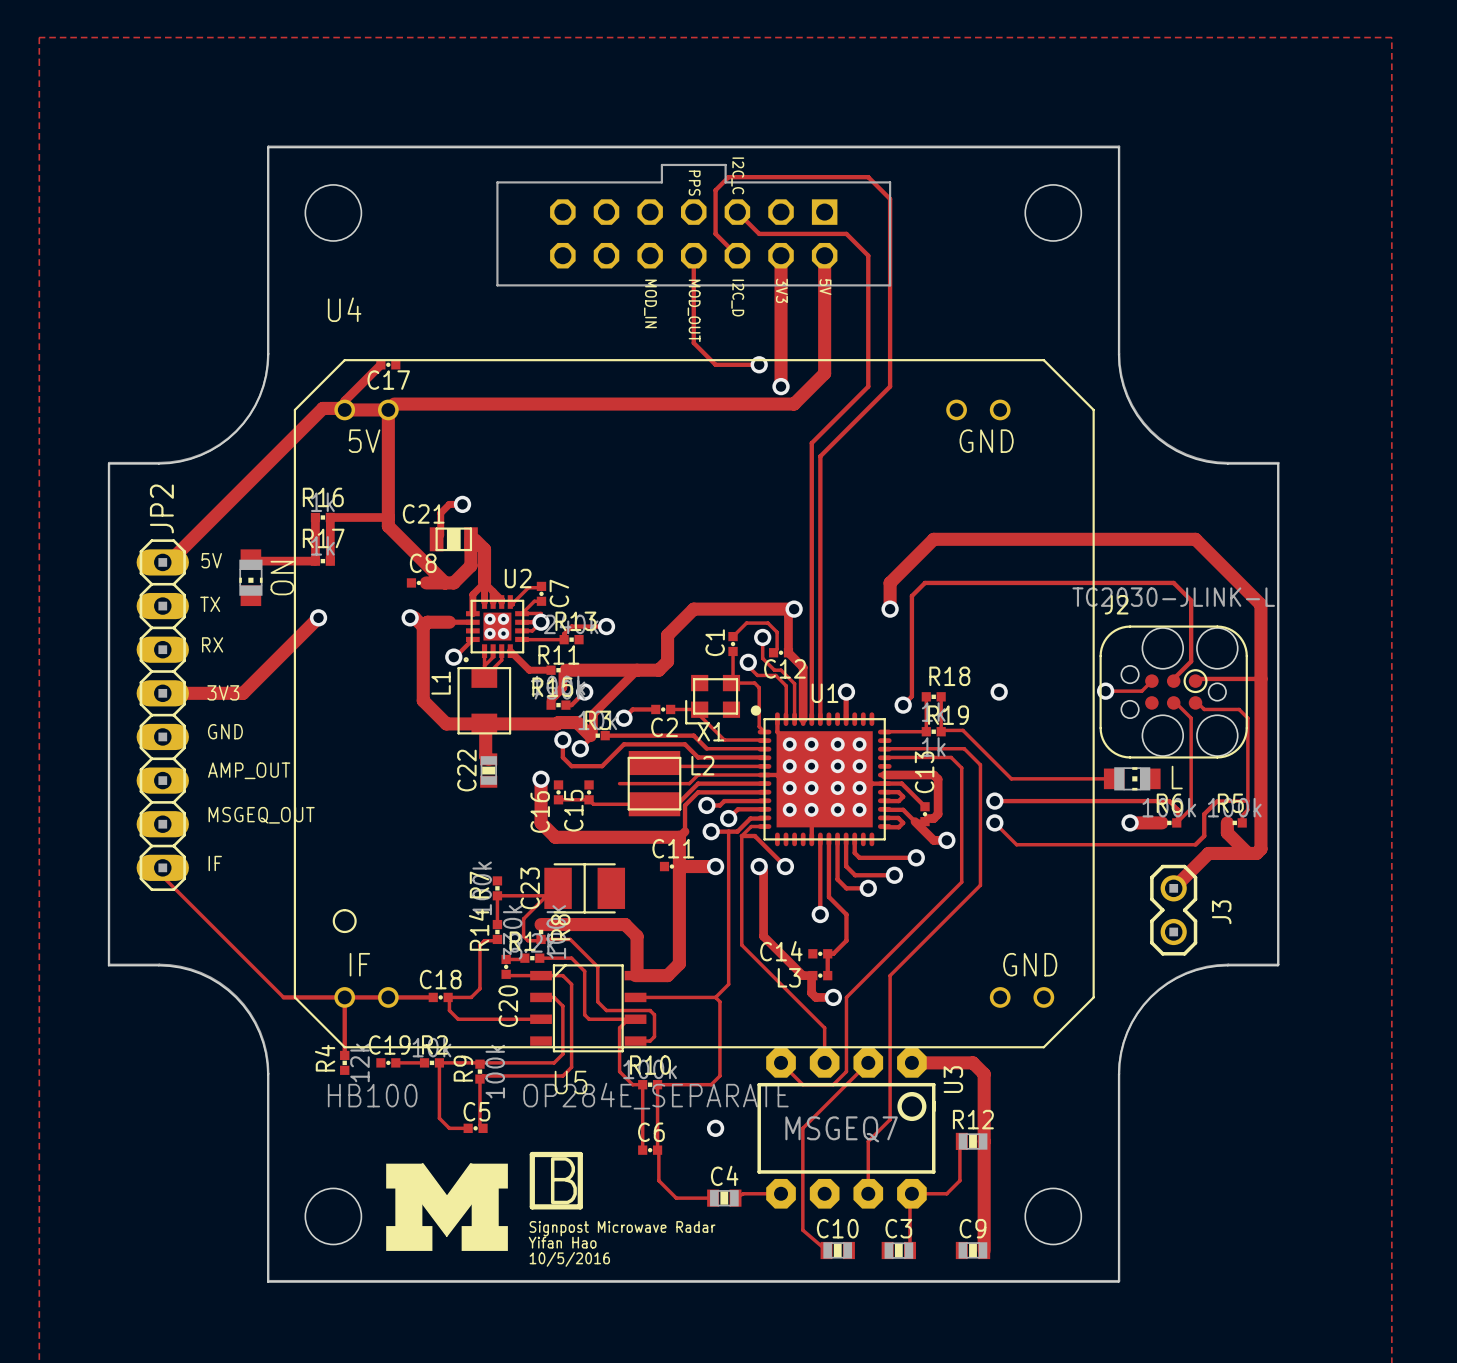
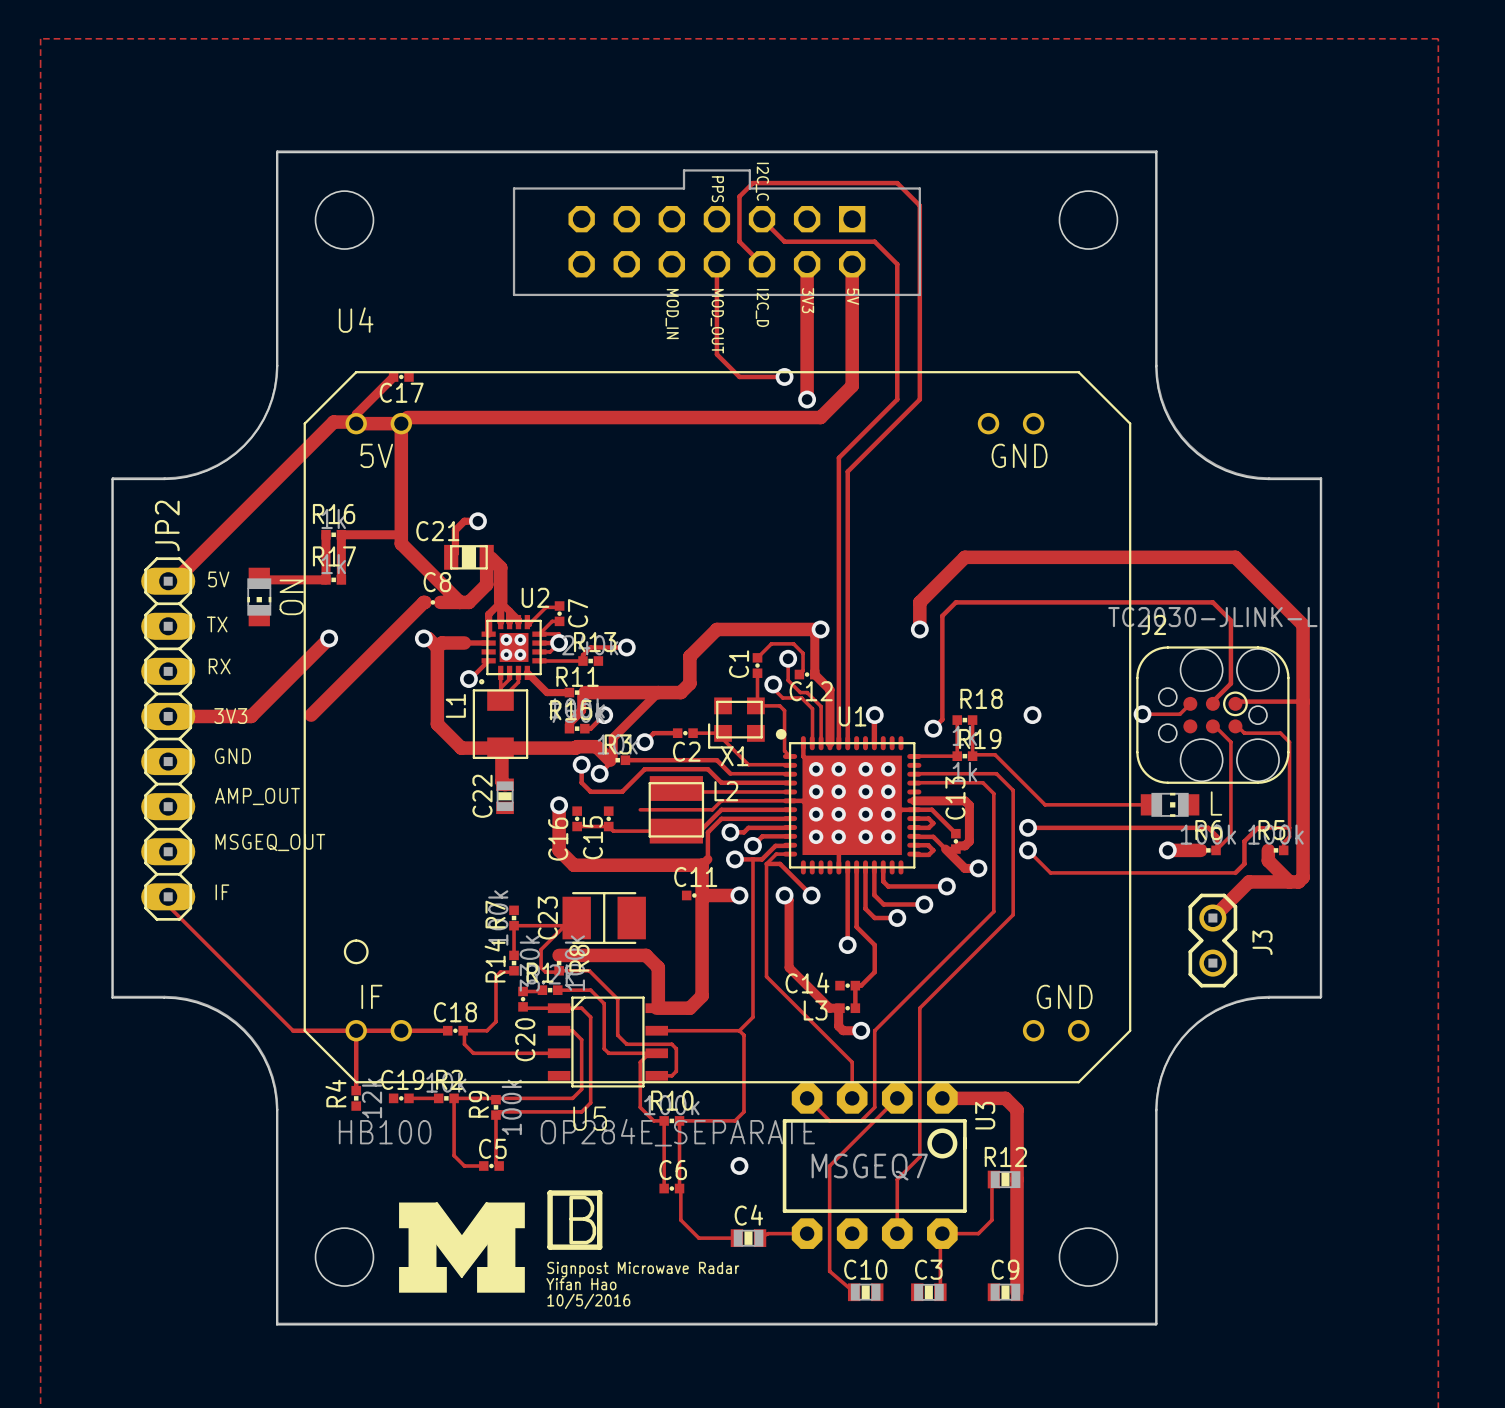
track: none -> (425, 602) (311, 715)

